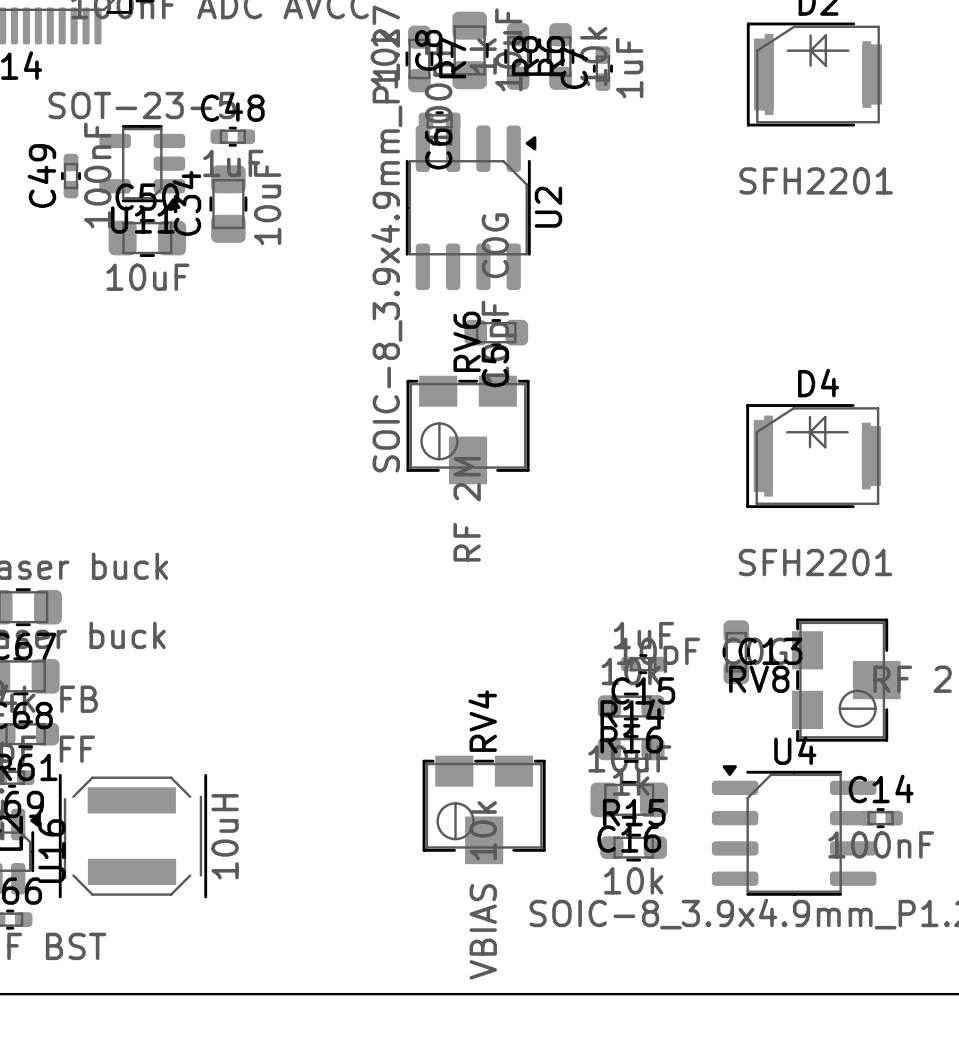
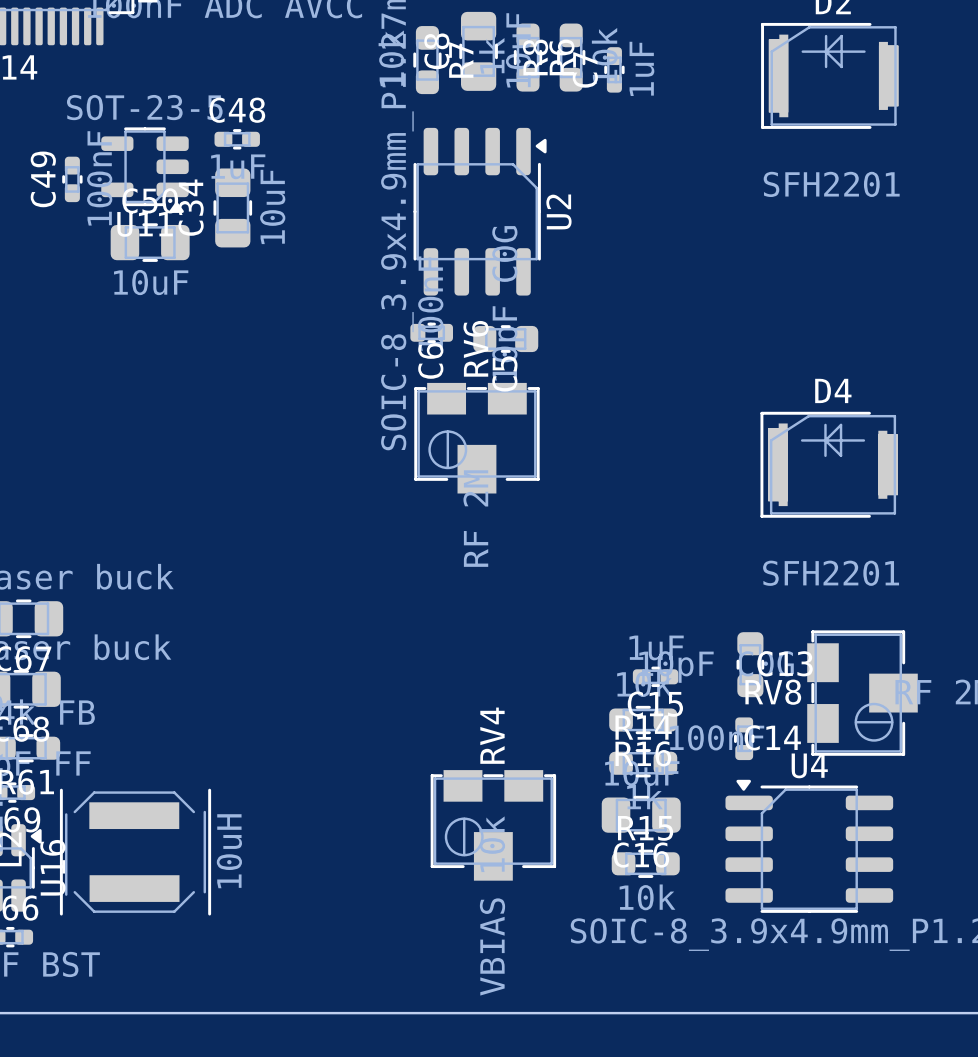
C6 position: (439, 121) -> (431, 332)
C14 footprint: [858, 808, 903, 829] -> [734, 717, 755, 761]

